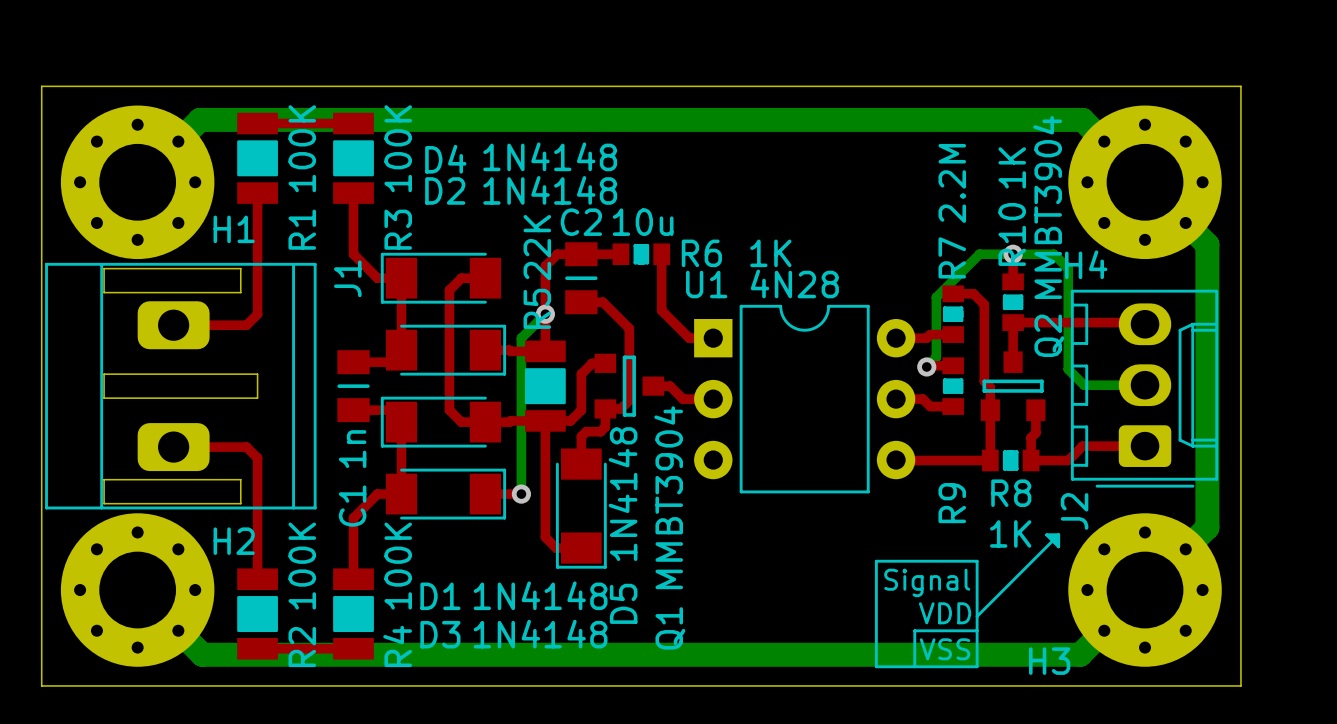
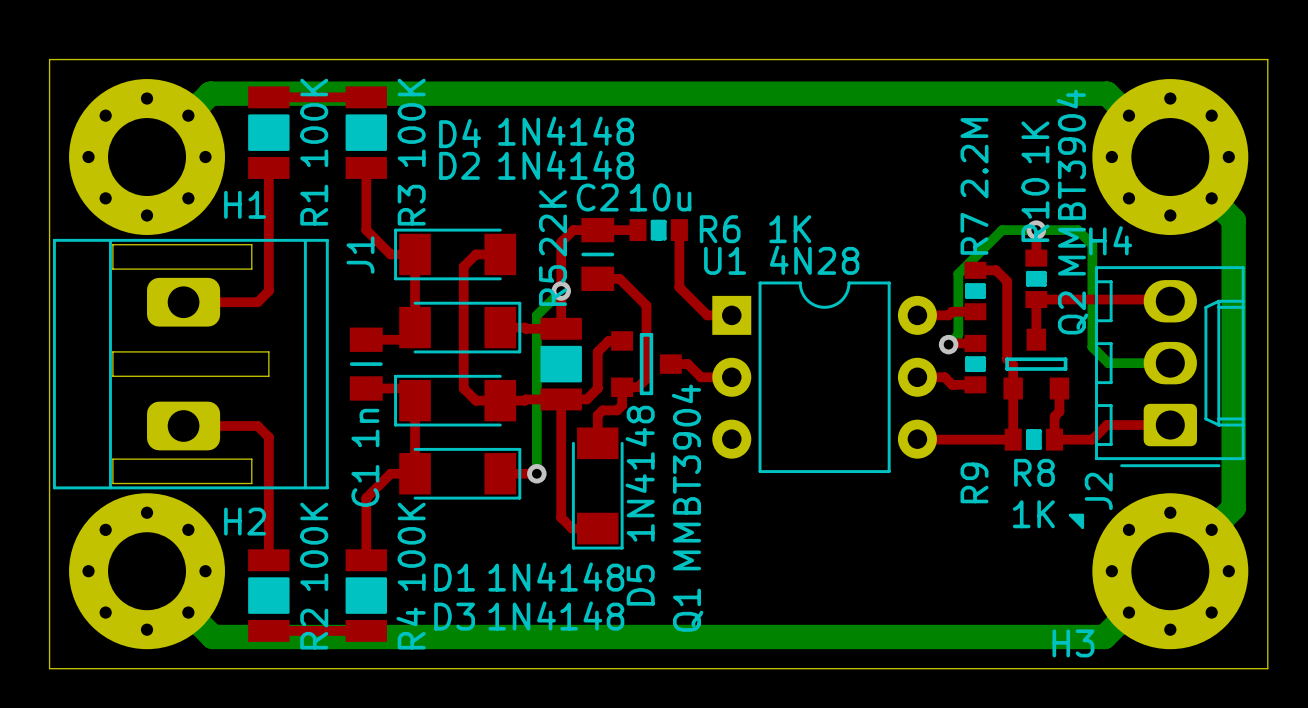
line: (1058, 534) (977, 616) -> none
line: (876, 561) (876, 666) (977, 666) (977, 561) (876, 561) -> none
text: Signal (927, 582) -> none
text: VDD (945, 613) -> none
line: (977, 630) (914, 630) (914, 666) -> none
text: VSS (945, 649) -> none

